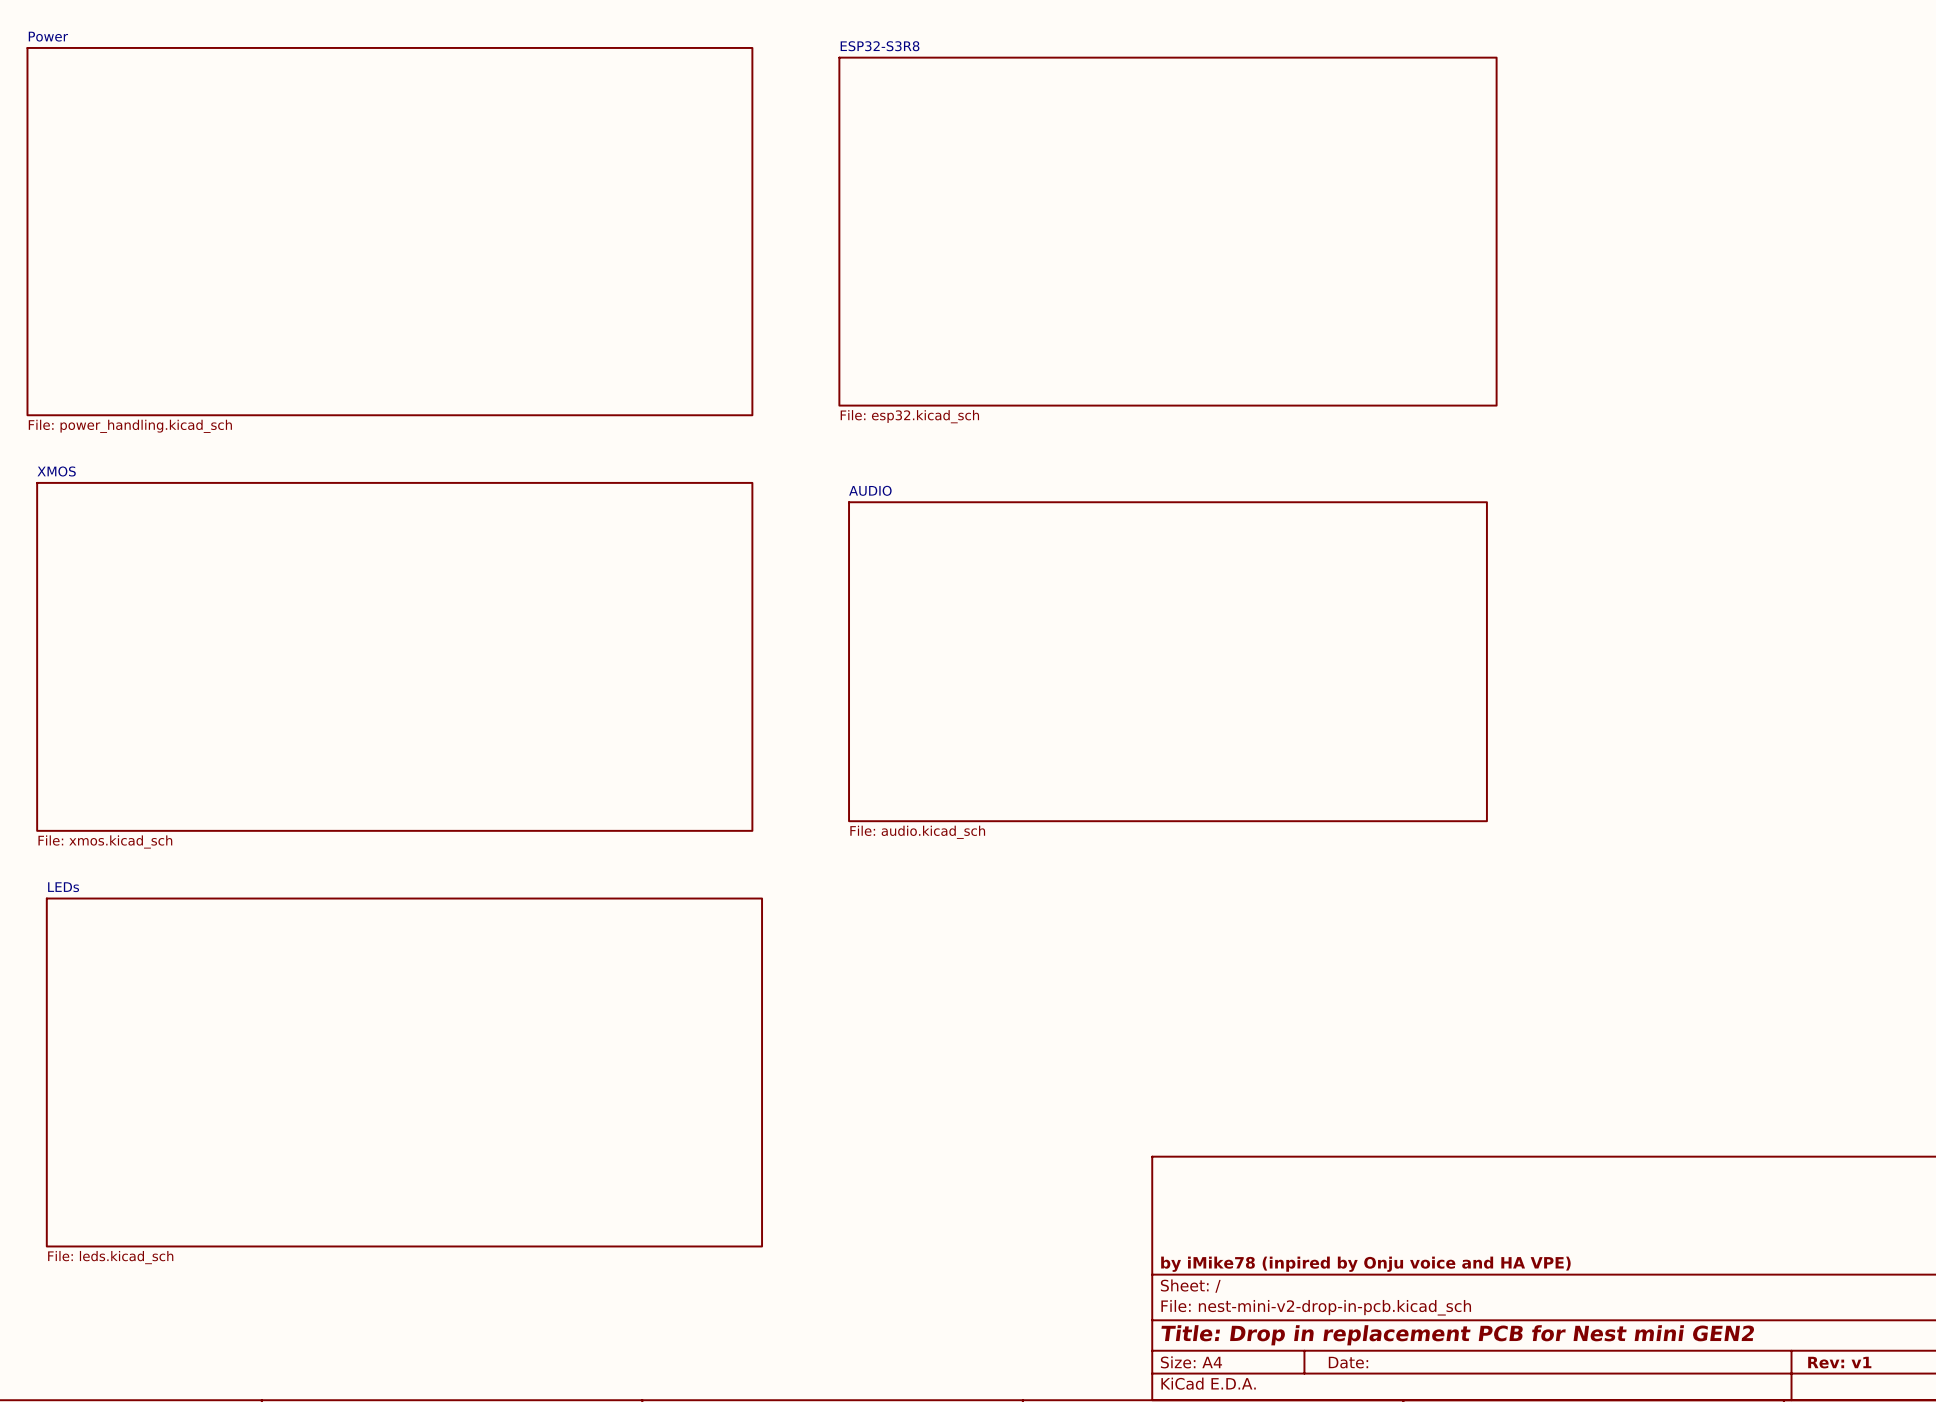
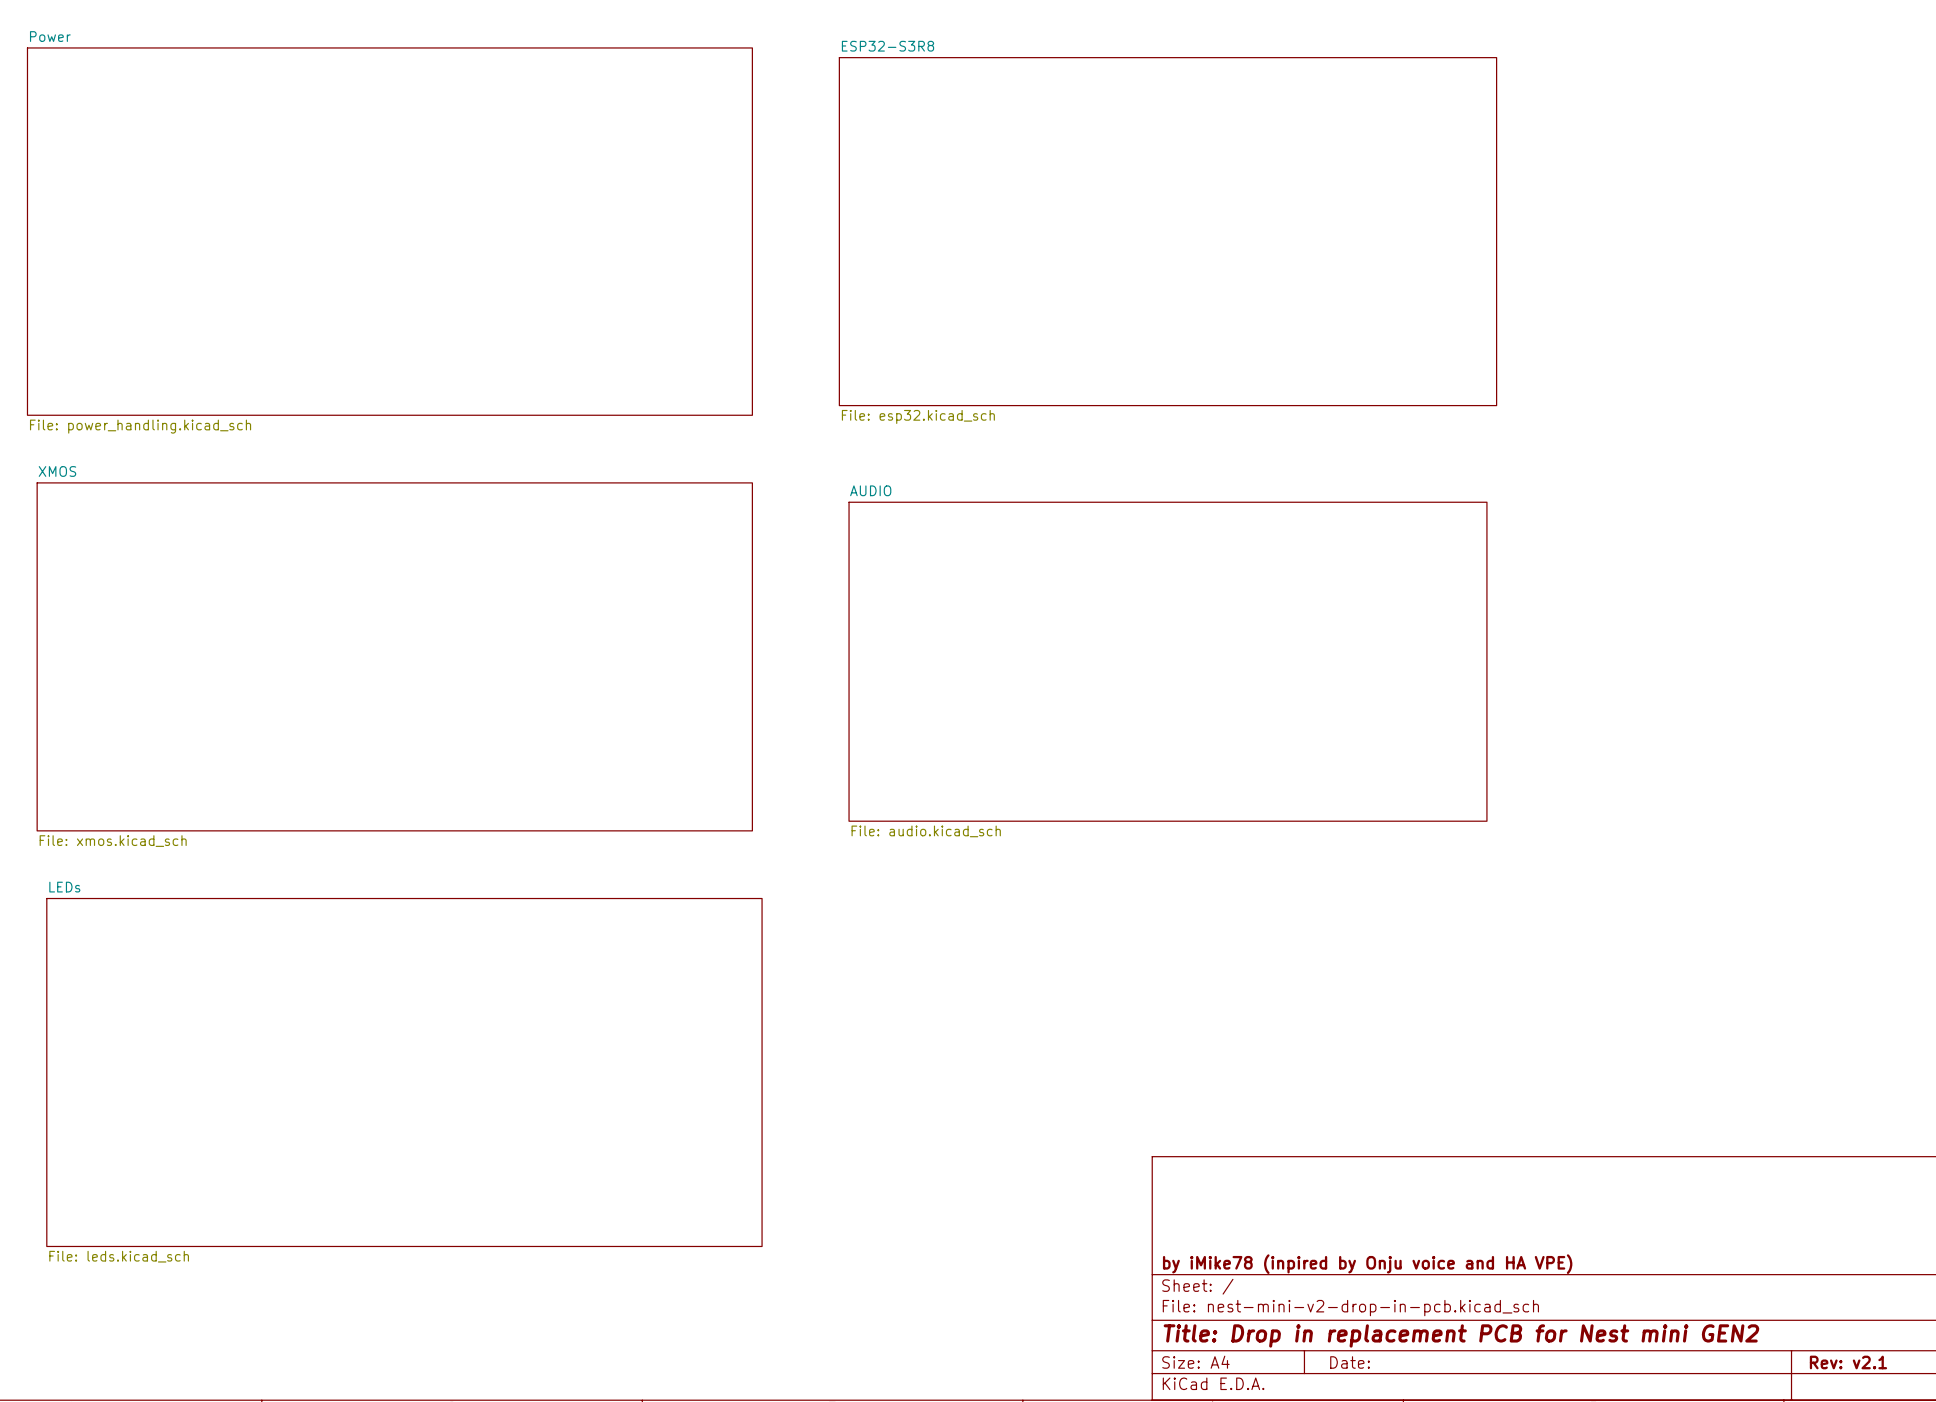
title block: Rev: v1 (1839, 1362) -> Rev: v2.1 (1848, 1362)

